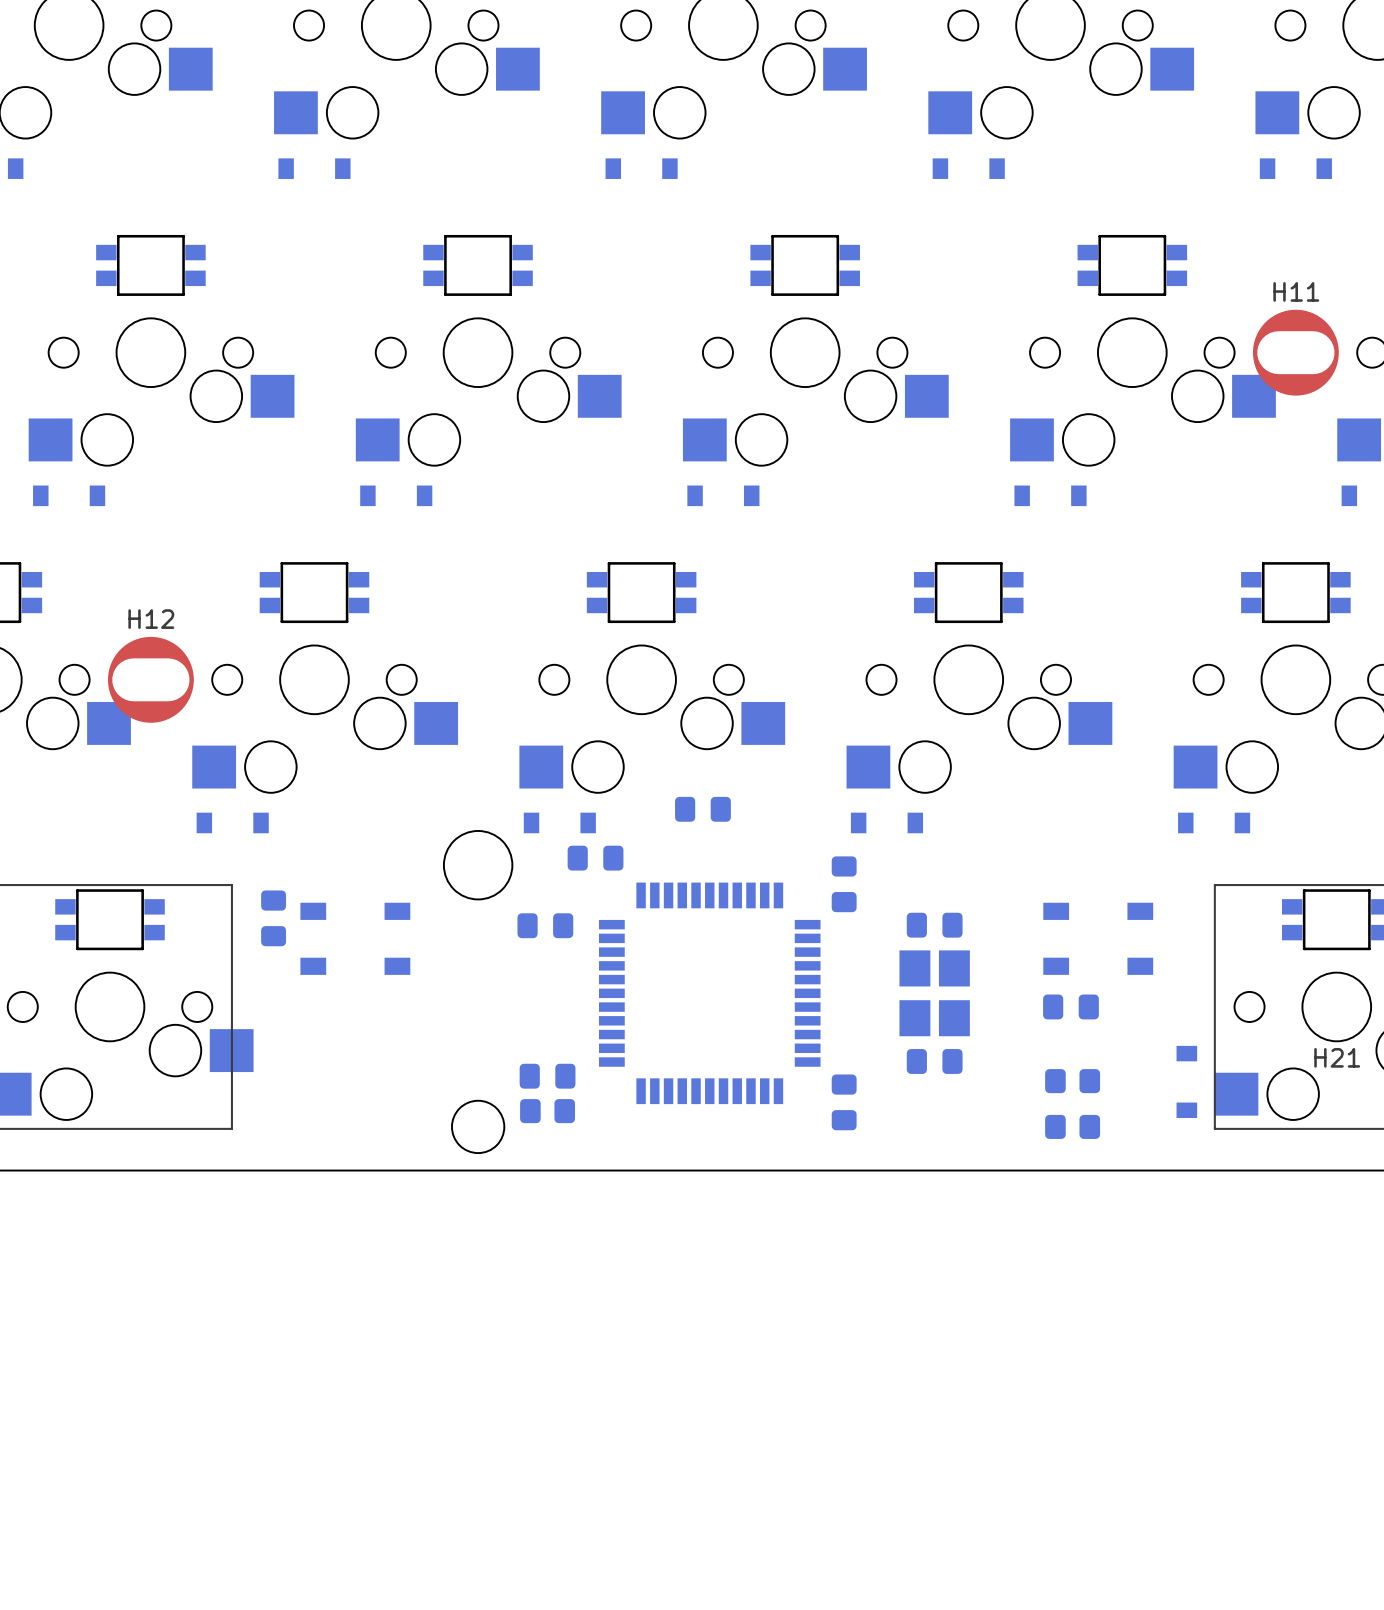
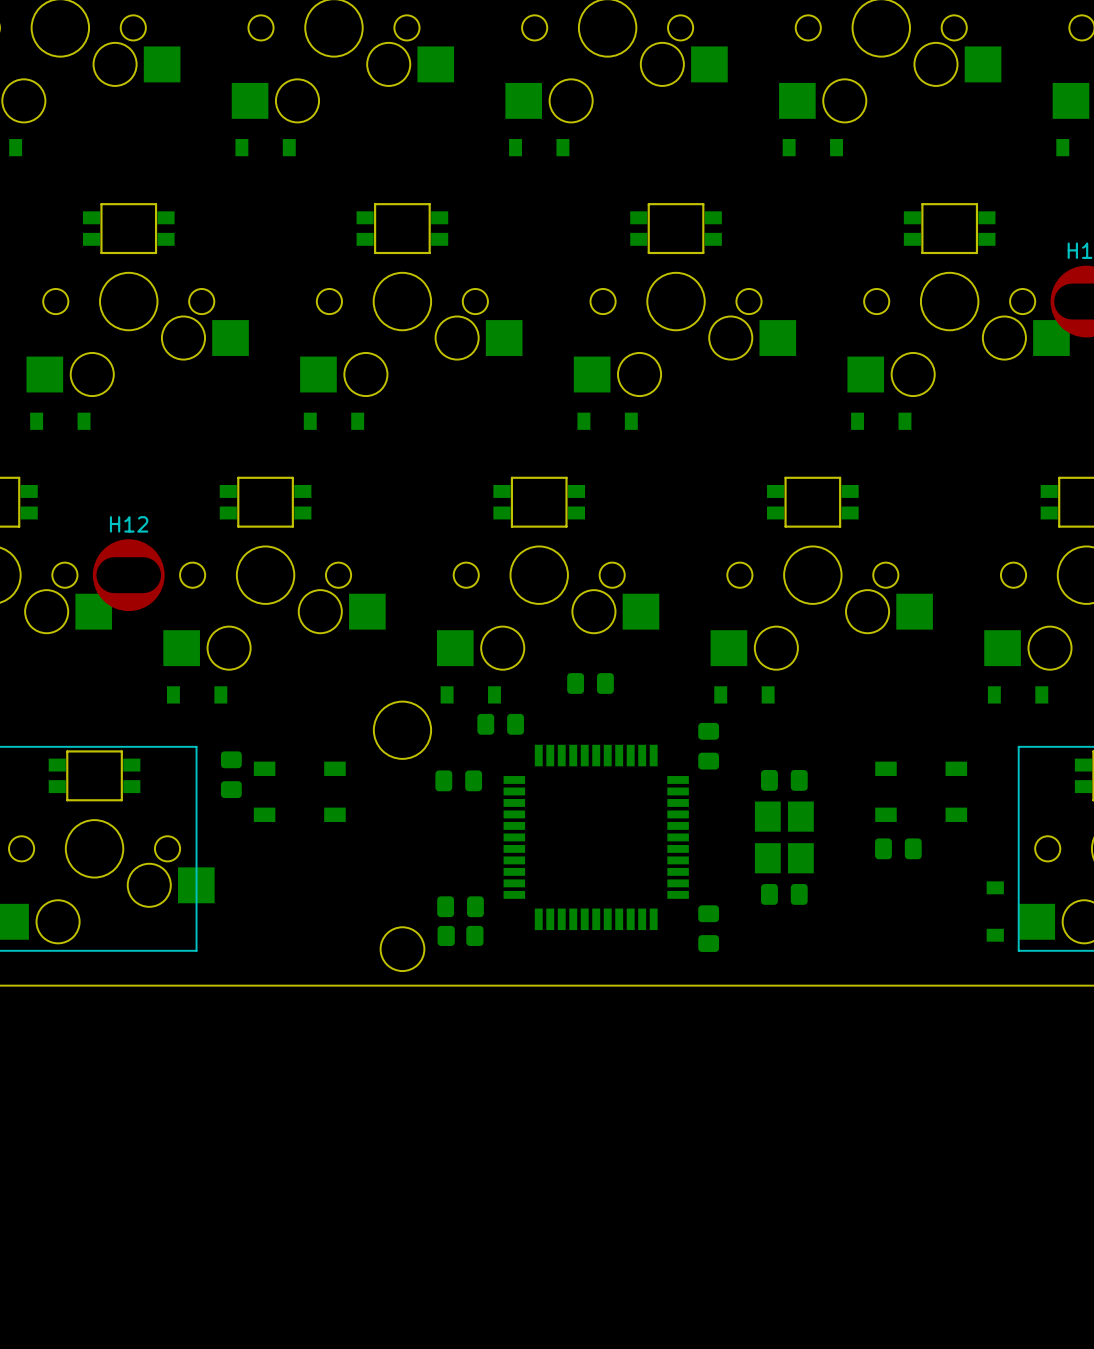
part: (1072, 1081) -> none
part: (1072, 1126) -> none

